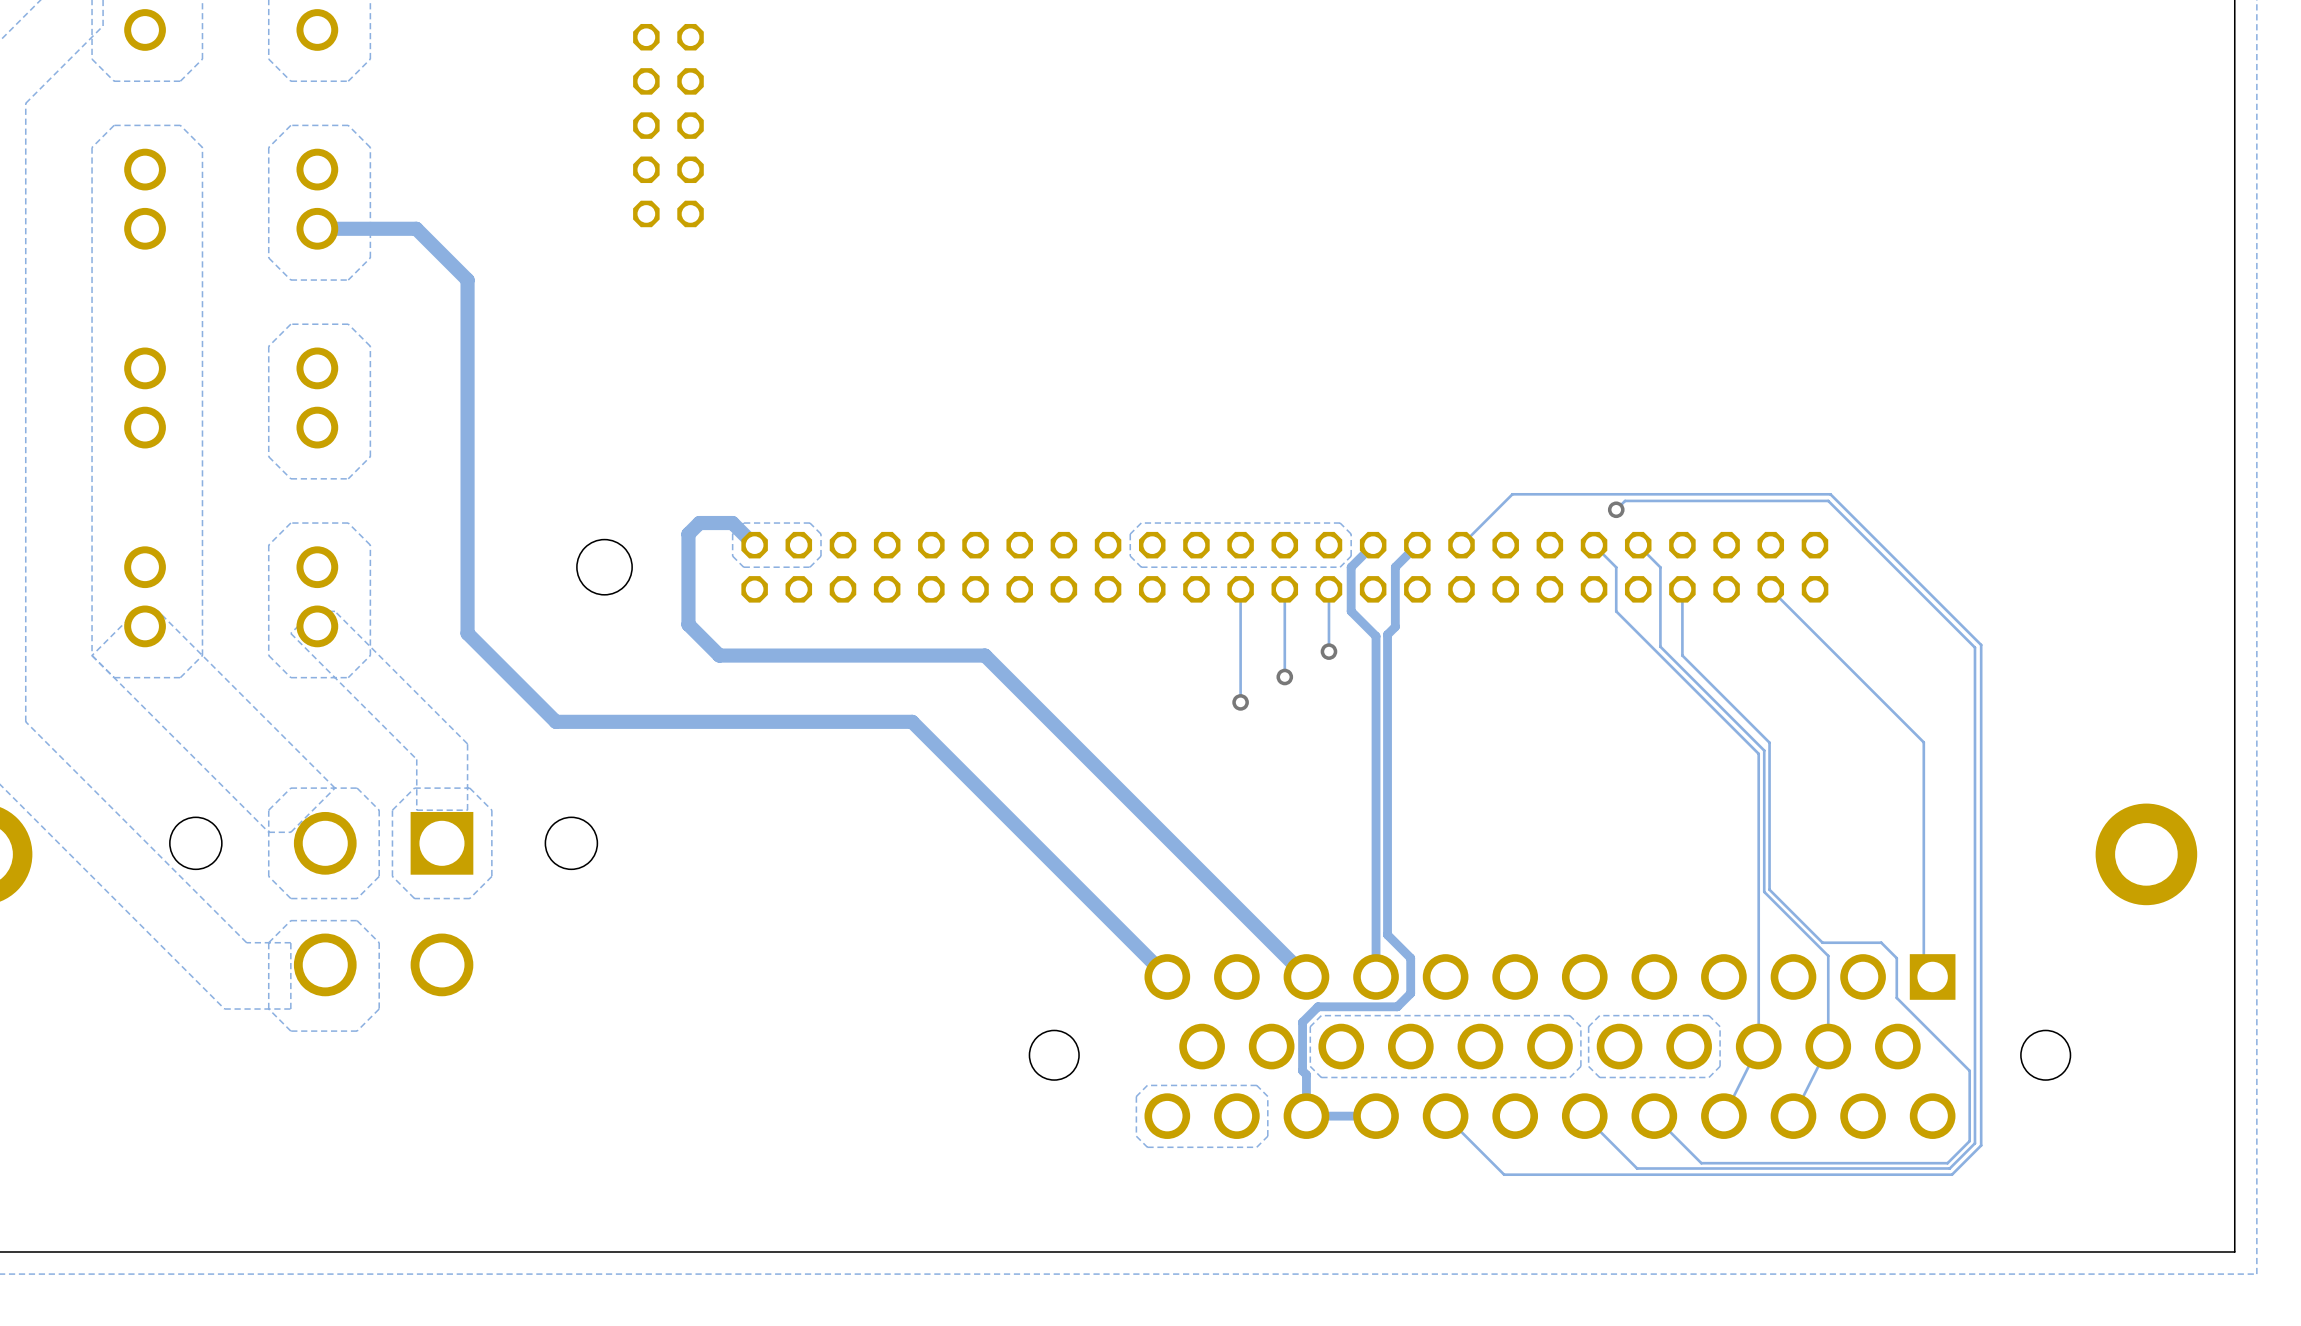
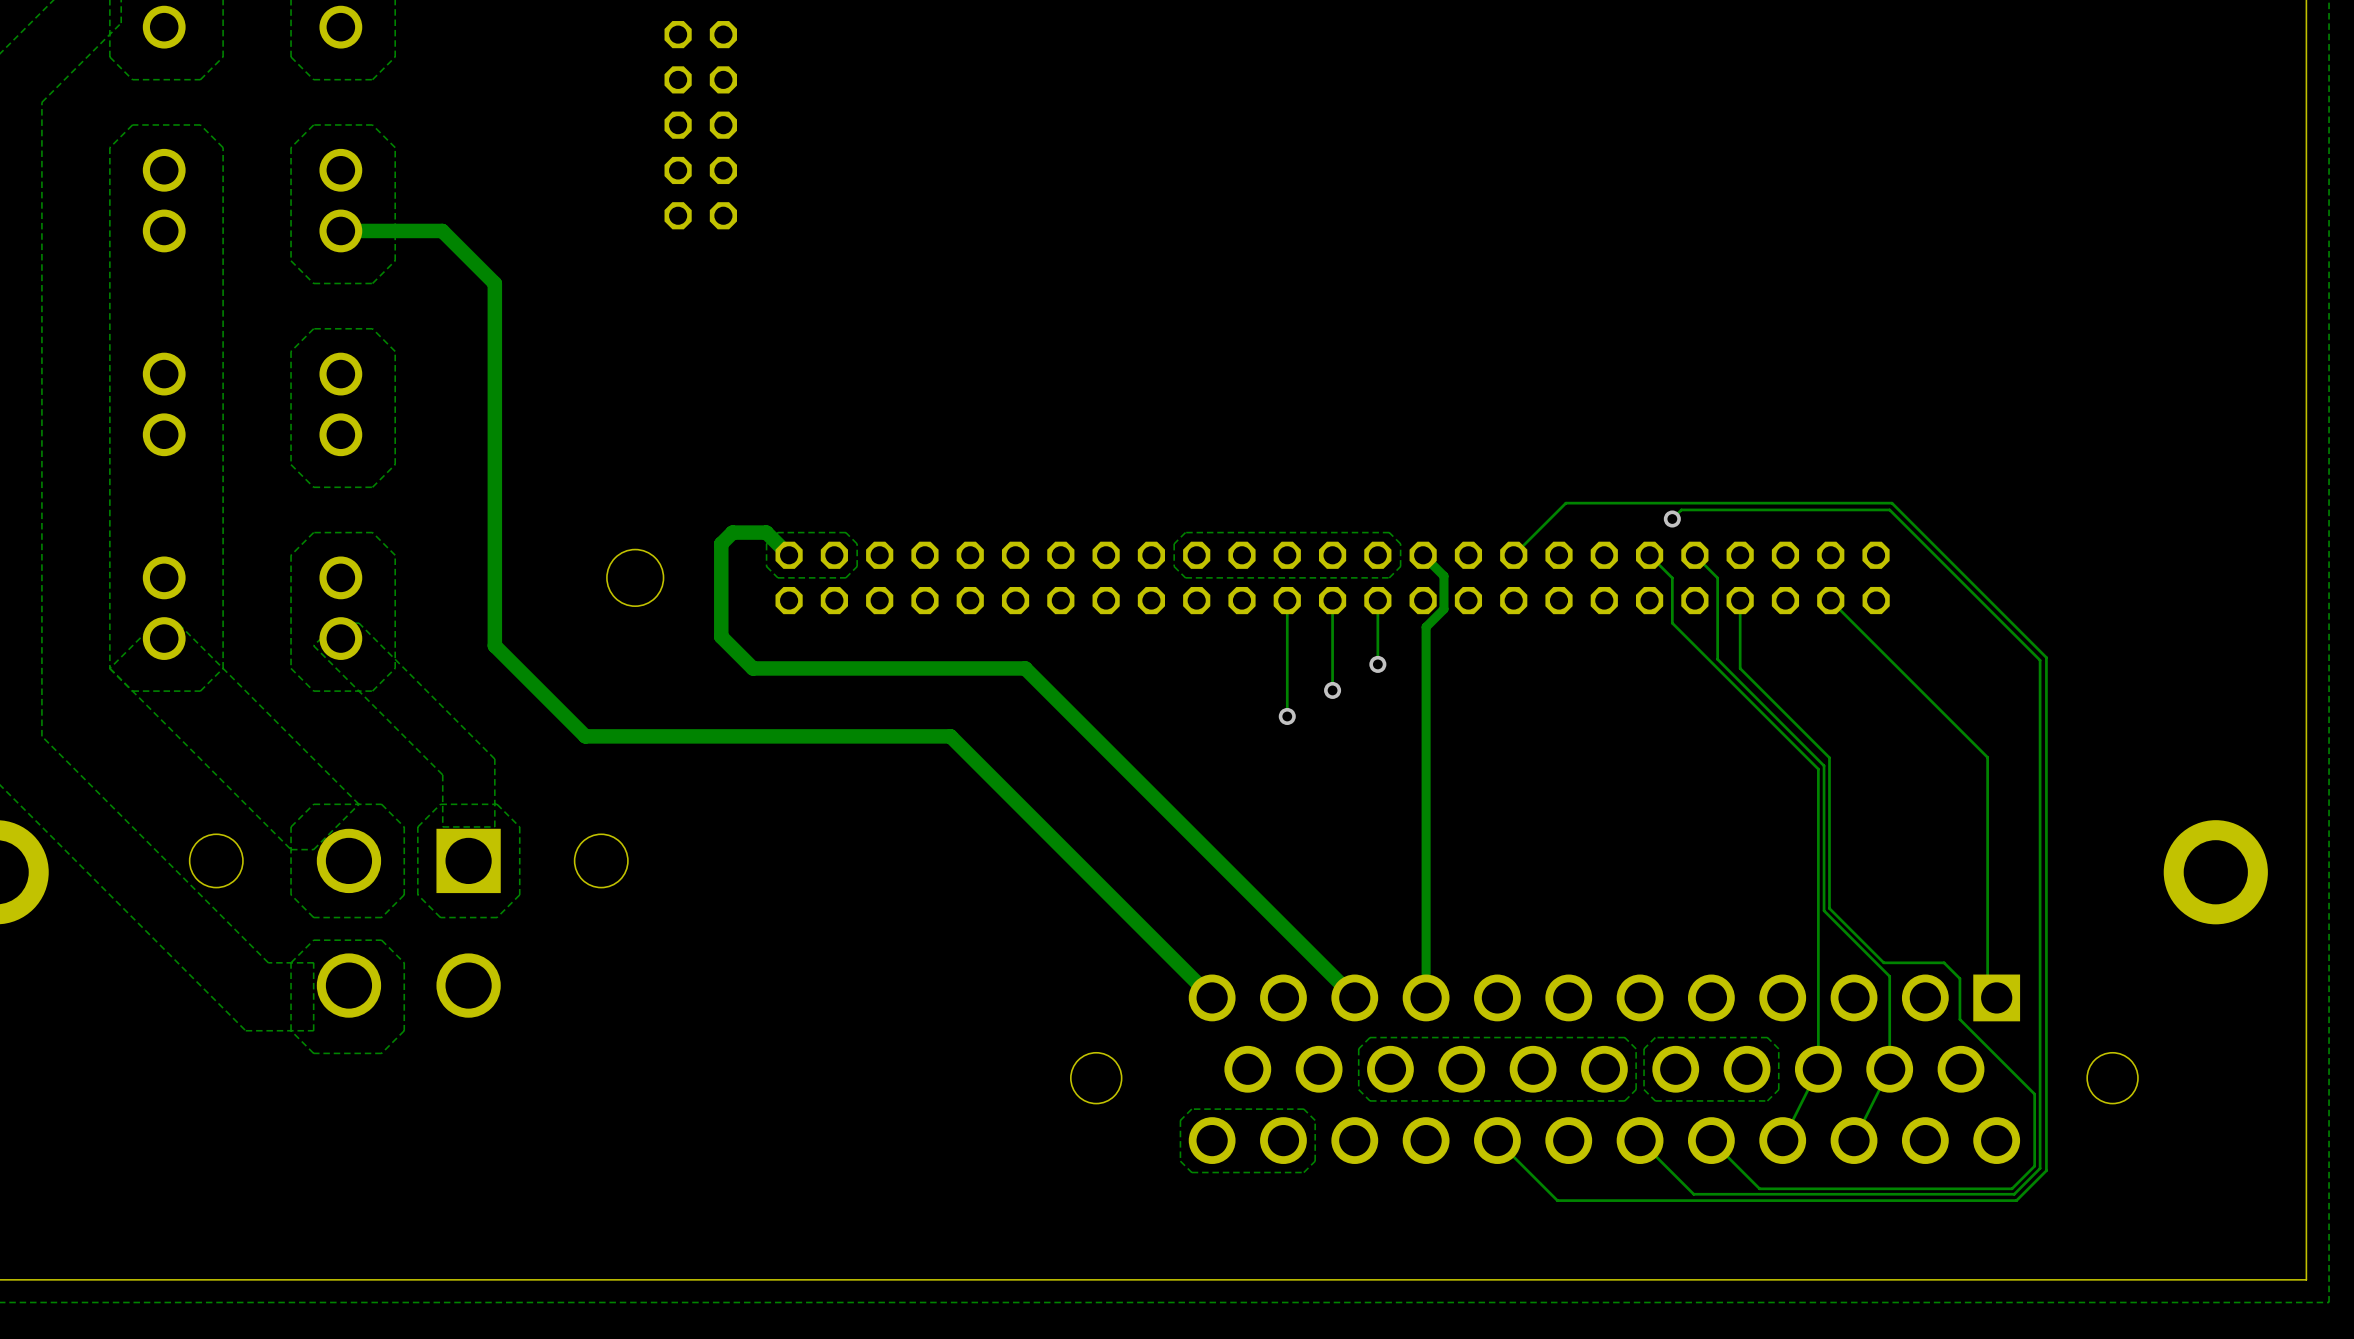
track: (1373, 545) (1351, 567) (1351, 611) (1376, 636) -> (1423, 555) (1443, 576) (1443, 609) (1426, 627) (1426, 648)
track: (1417, 545) (1395, 567) (1395, 626) (1387, 634) (1387, 934) (1410, 958) (1410, 993) (1397, 1006) (1318, 1006) (1302, 1022) (1302, 1070) (1306, 1074) (1306, 1116) (1376, 1116) -> none

